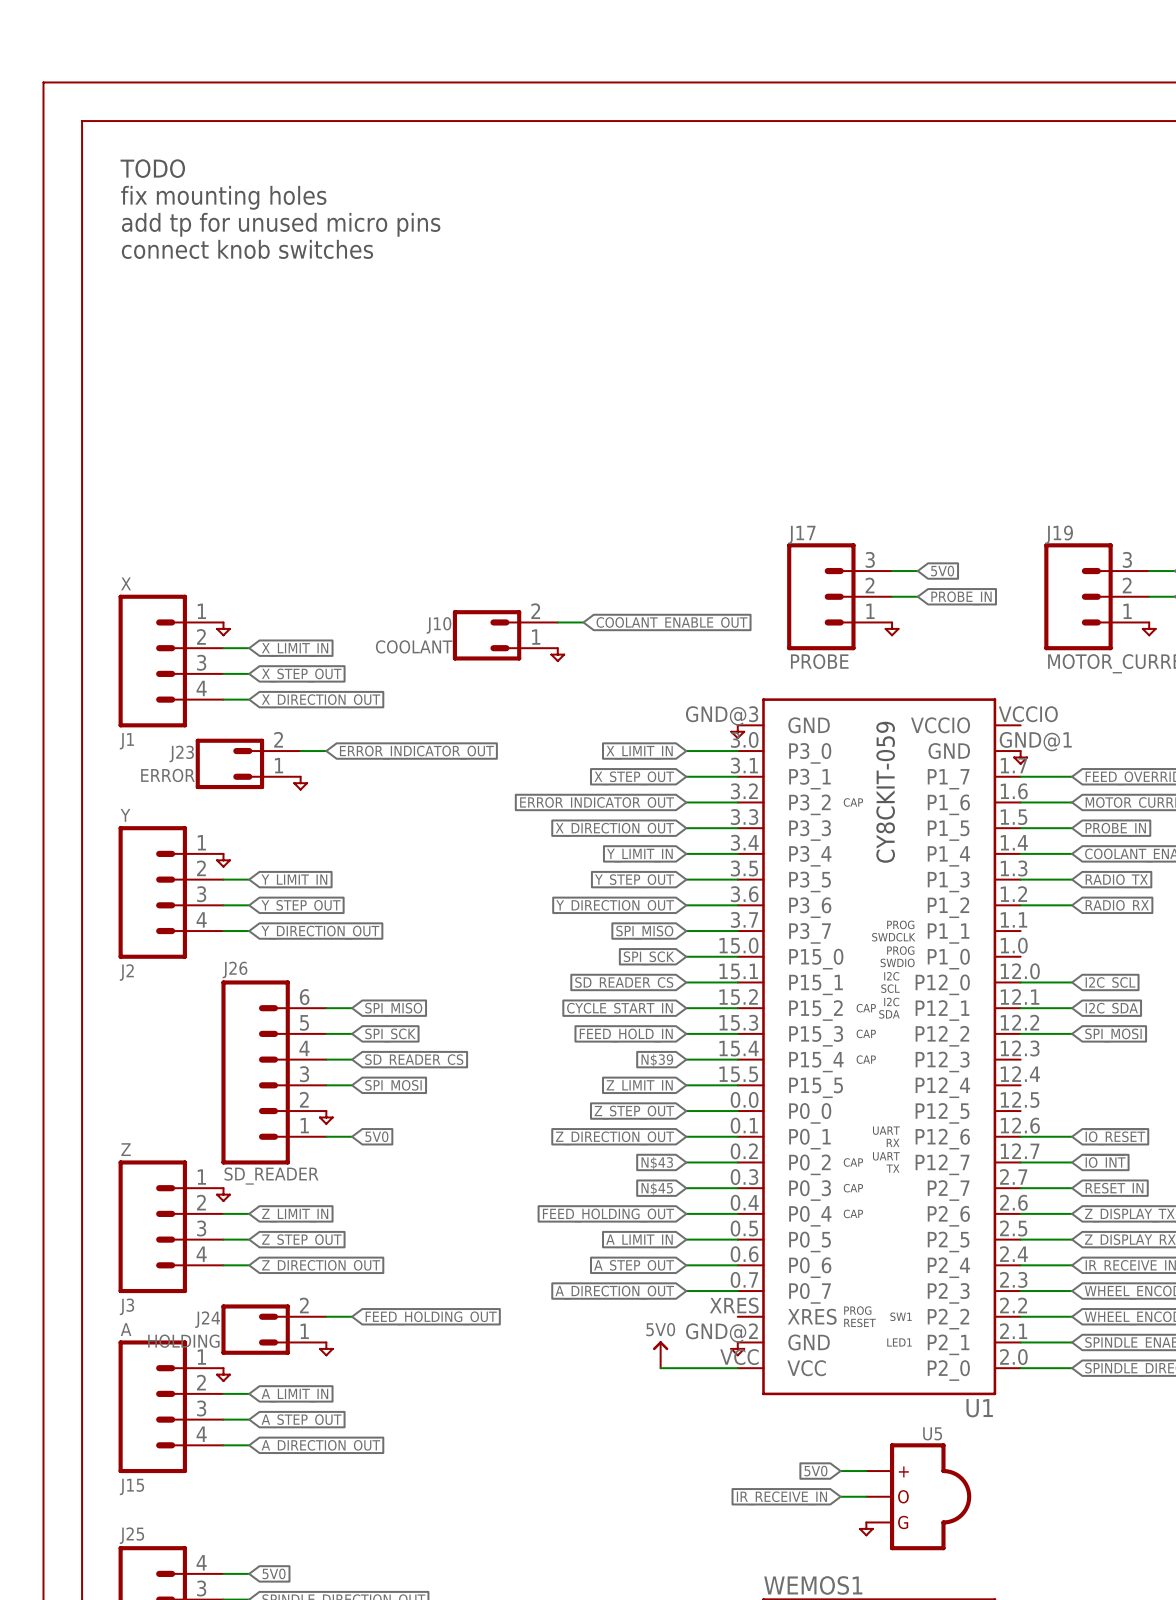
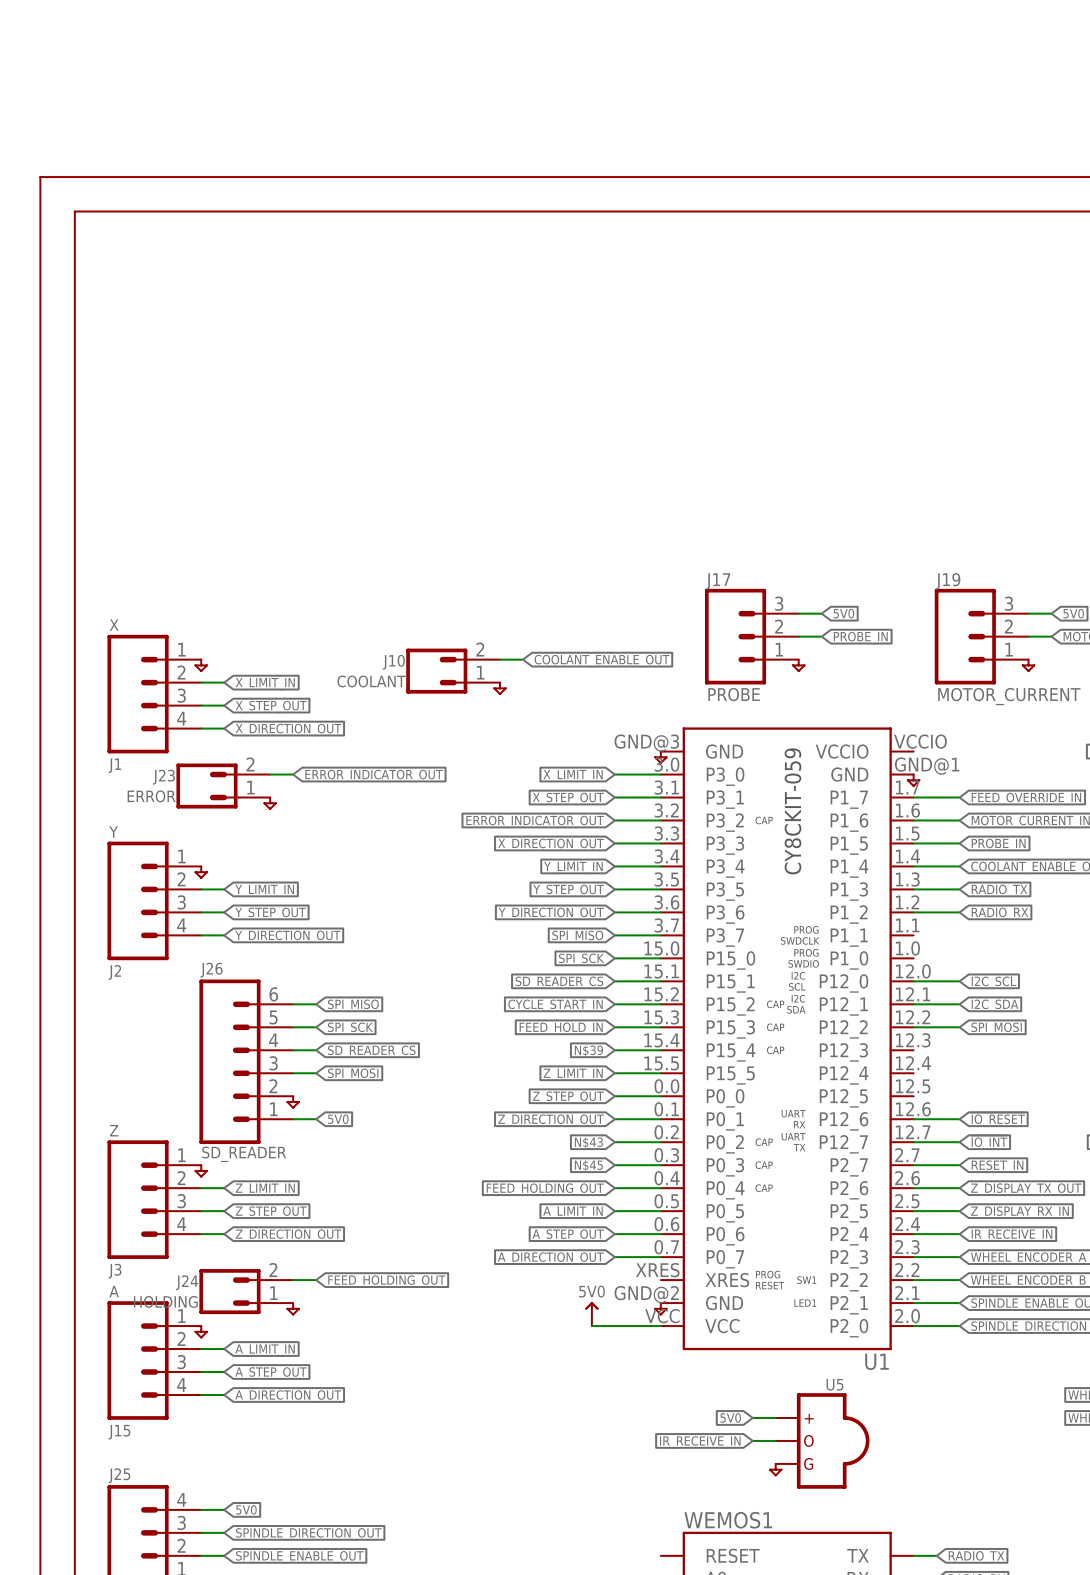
text: TODO (152, 168) -> none
text: fix mounting holes (223, 197) -> none
text: add tp for unused micro pins (281, 224) -> none
text: connect knob switches (247, 249) -> none

